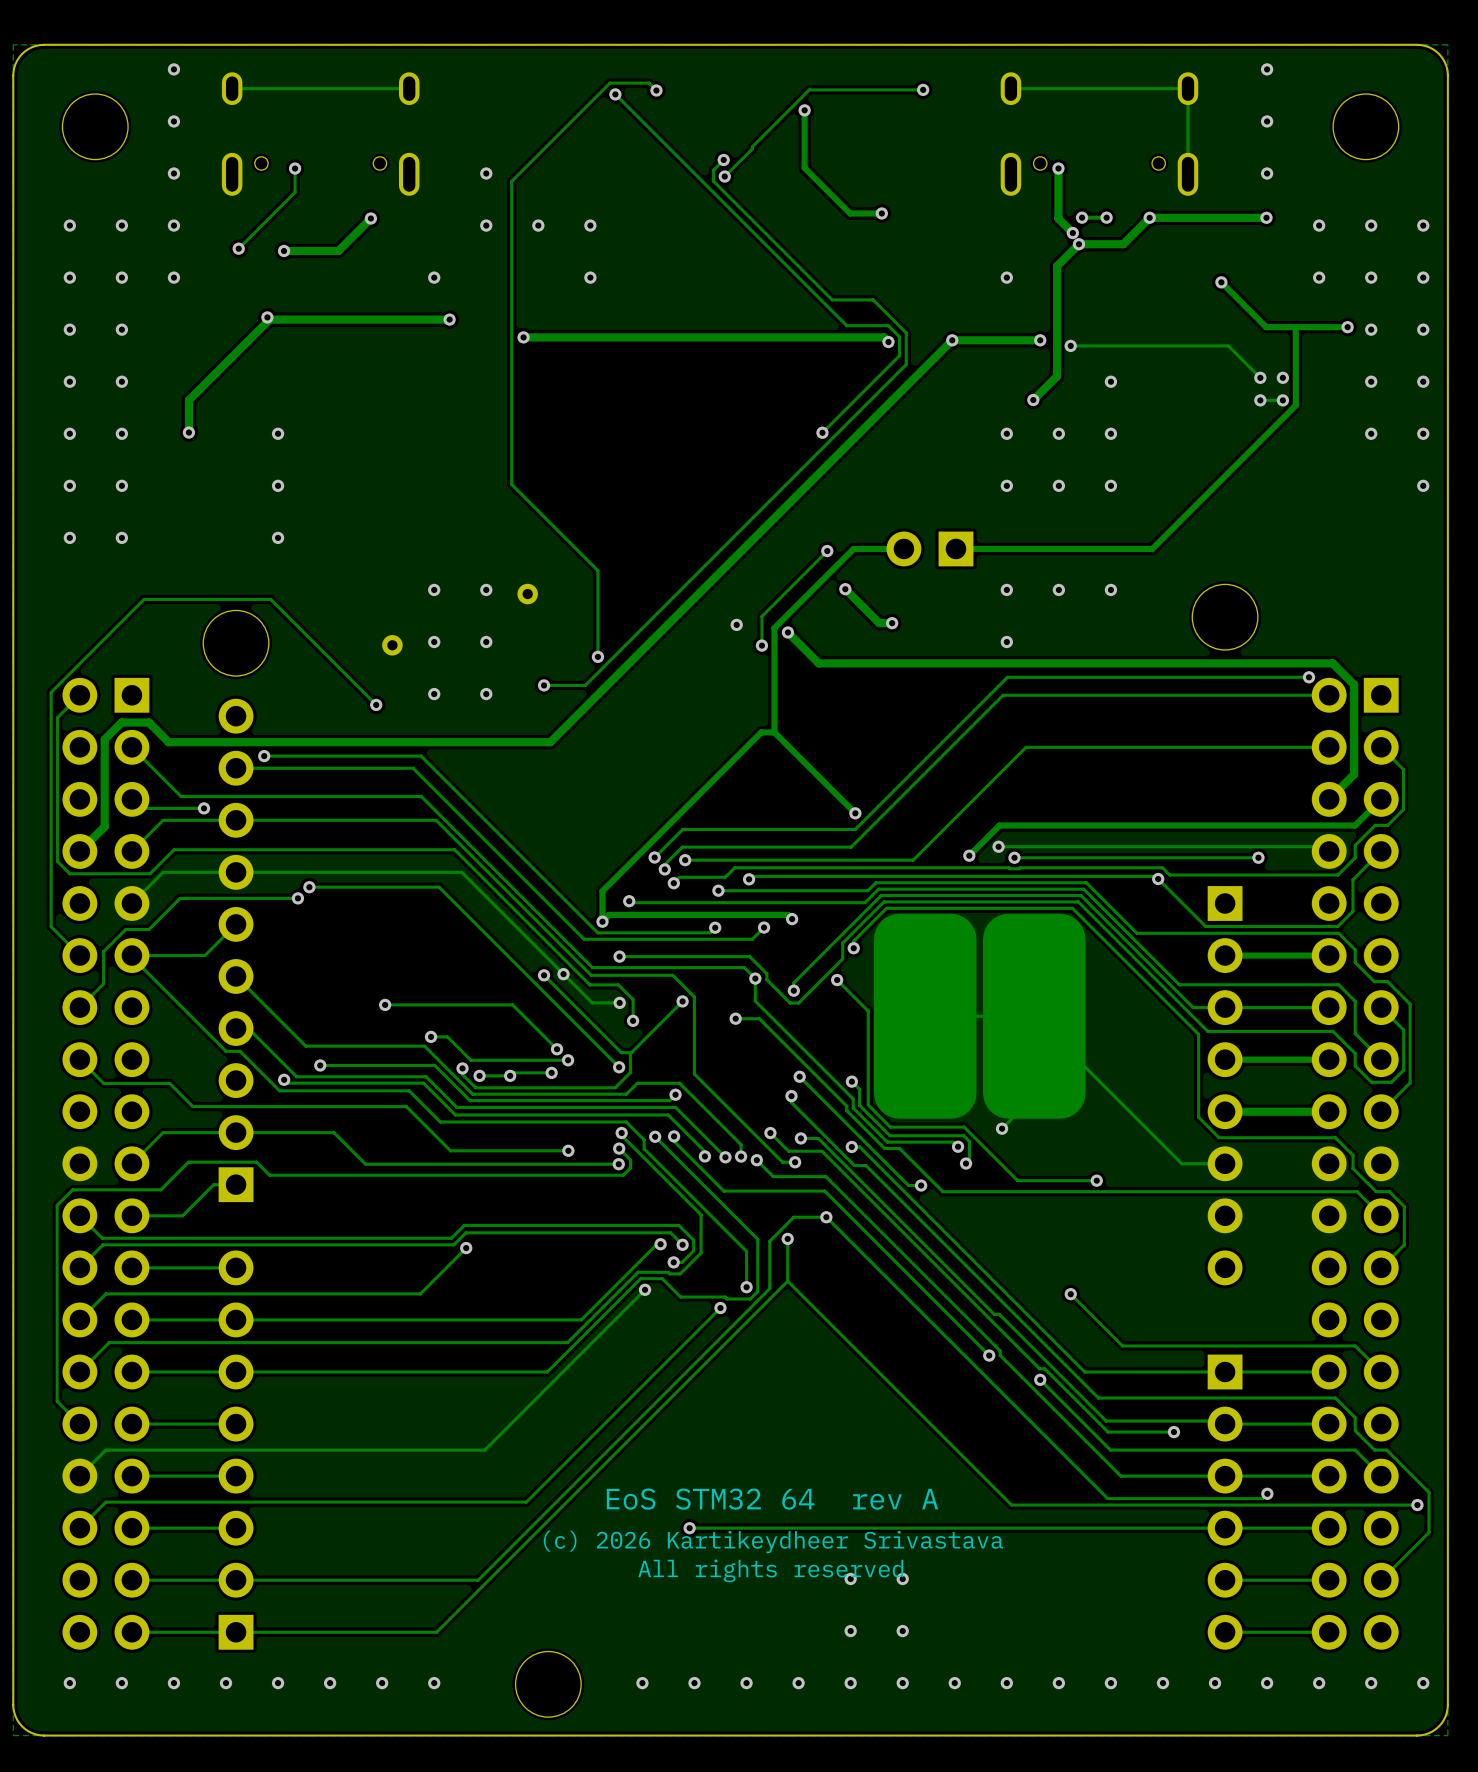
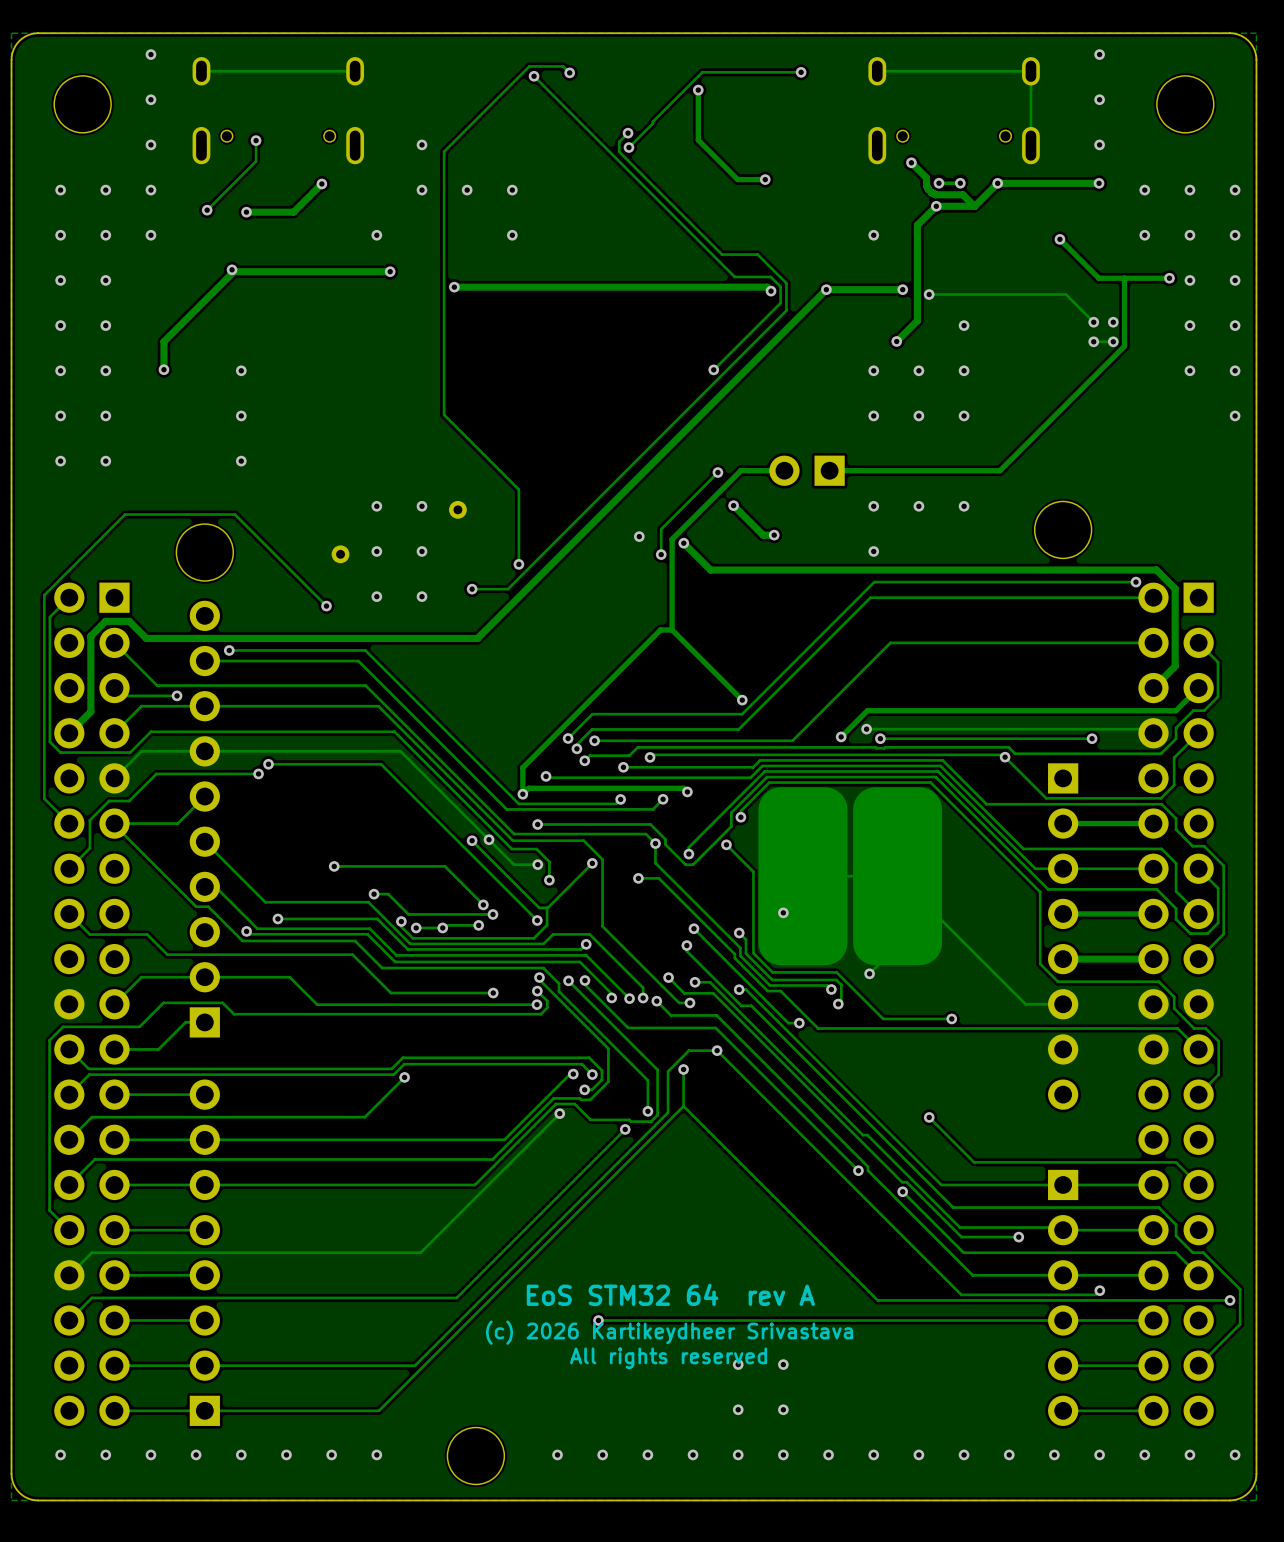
track: (1058, 168) (1058, 218) (1072, 233) -> none
via: (1058, 168) -> none
track: none -> (911, 162) (926, 177) (926, 185) (931, 193) (935, 194) (963, 194) (974, 206)
via: none -> (911, 162)
via: (1072, 233) -> none
via: none -> (783, 912)

